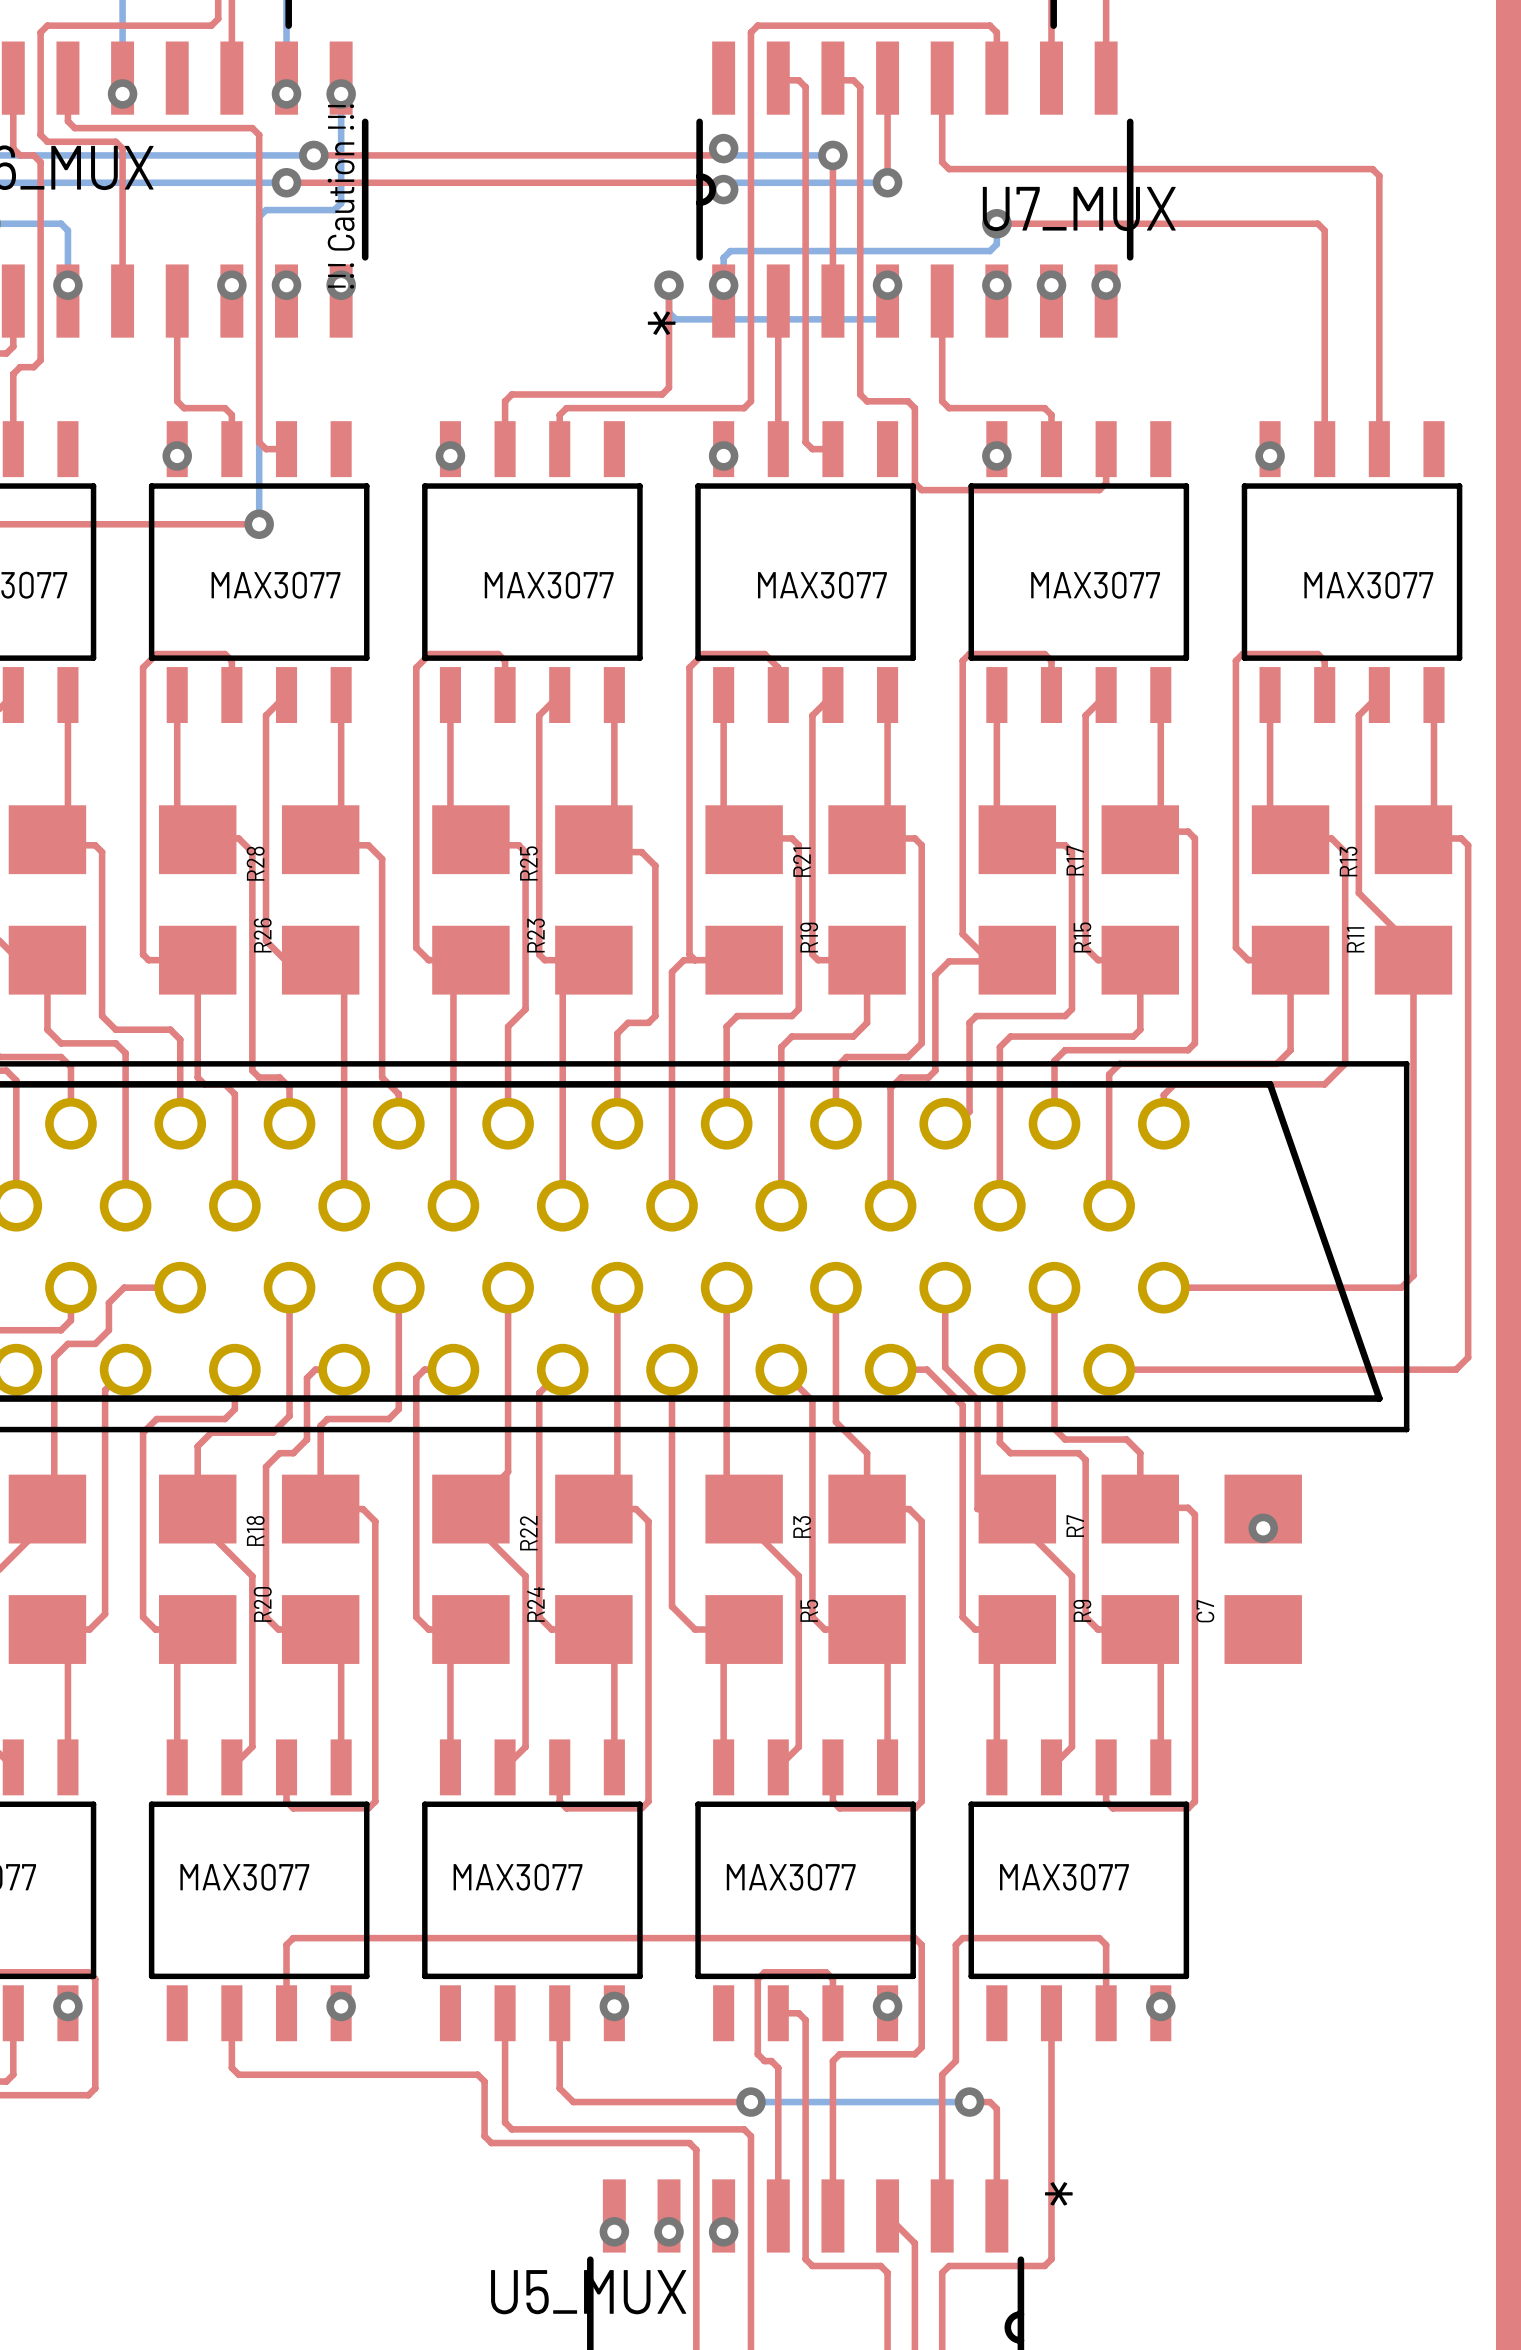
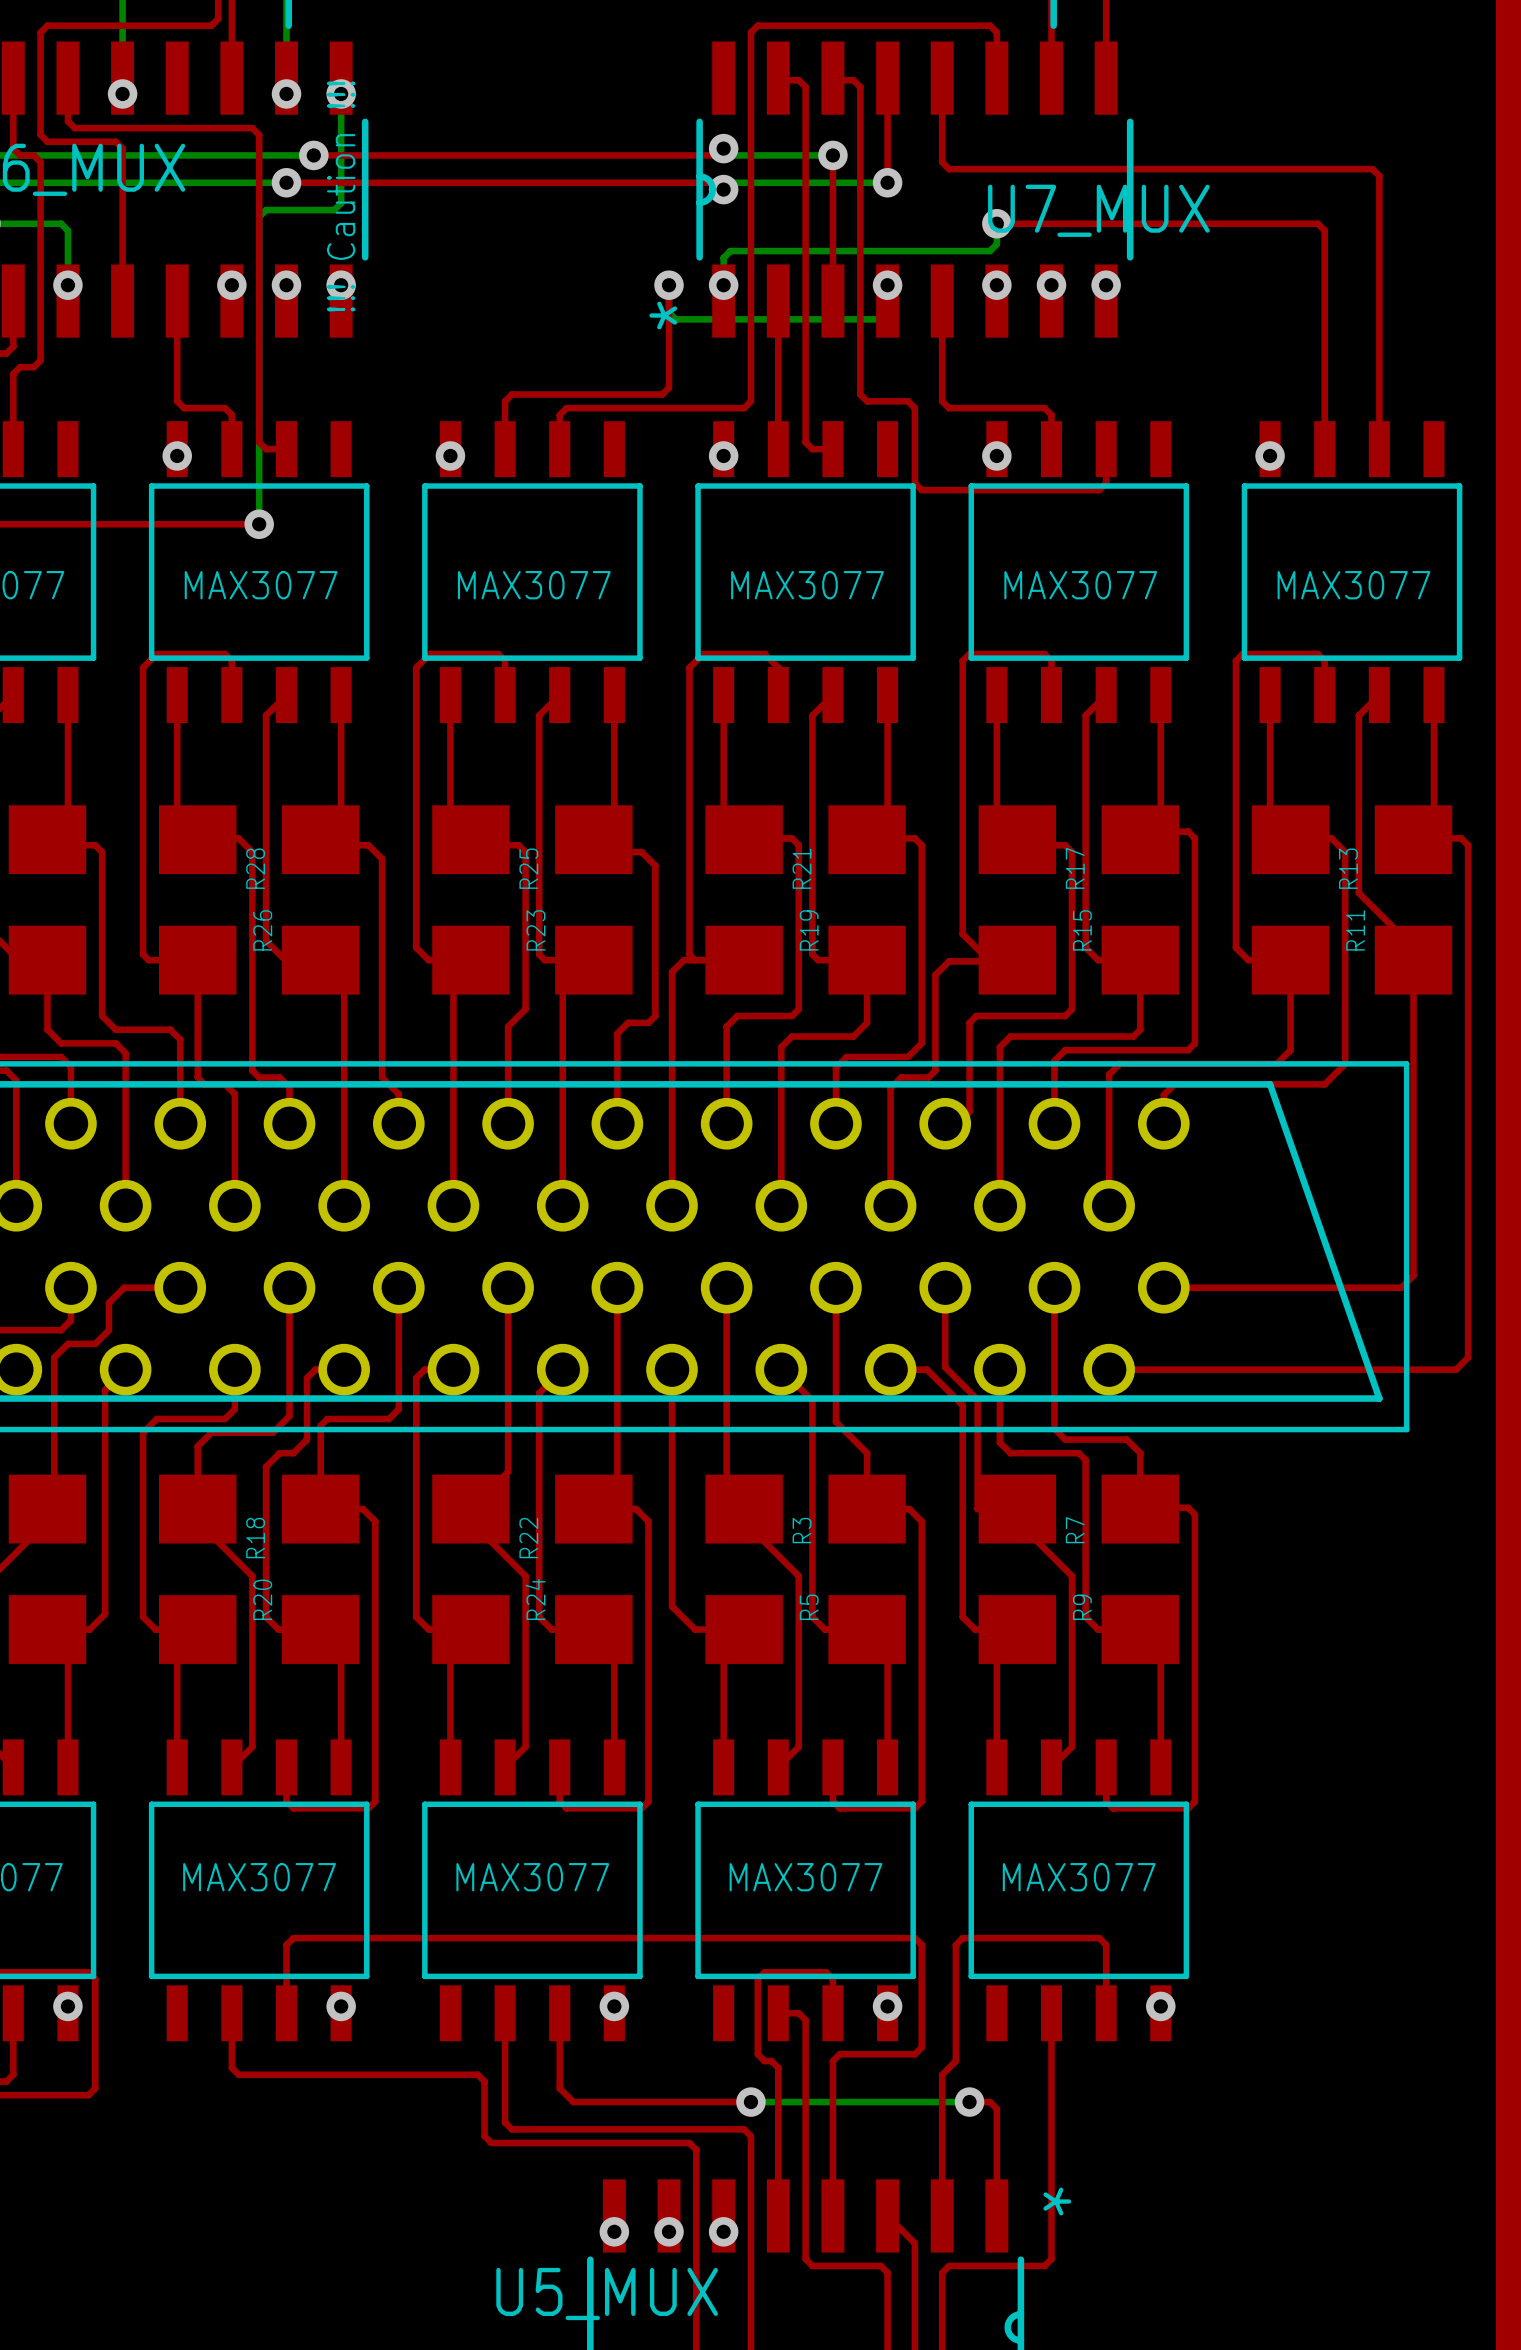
via: (1263, 1528) -> none
C7: (1263, 1569) -> none

